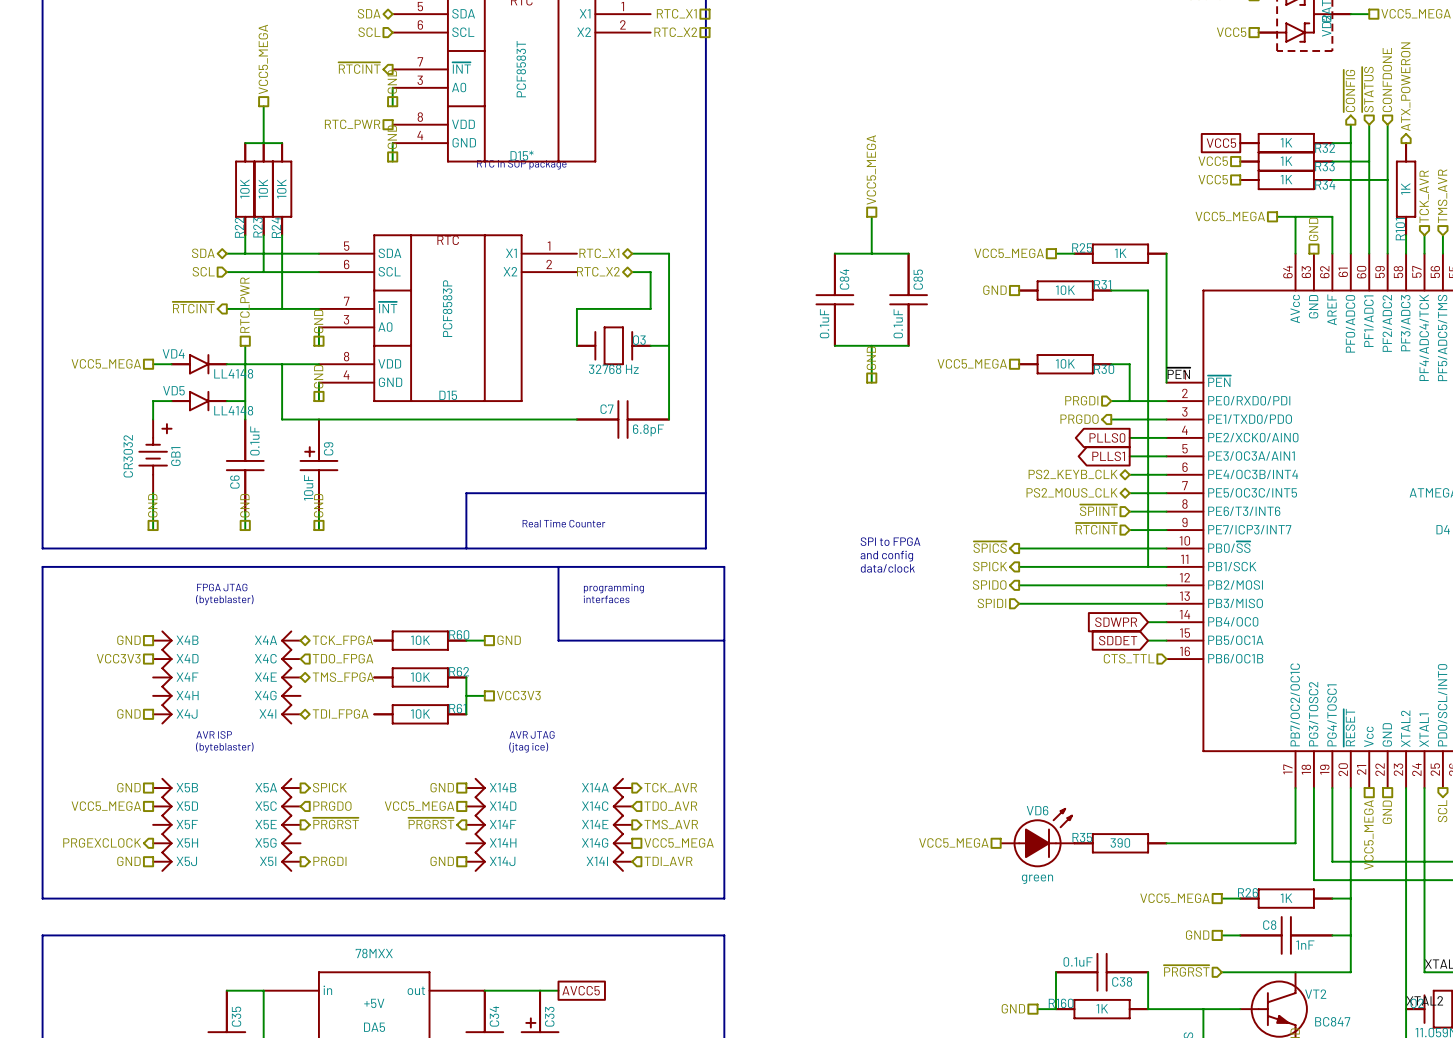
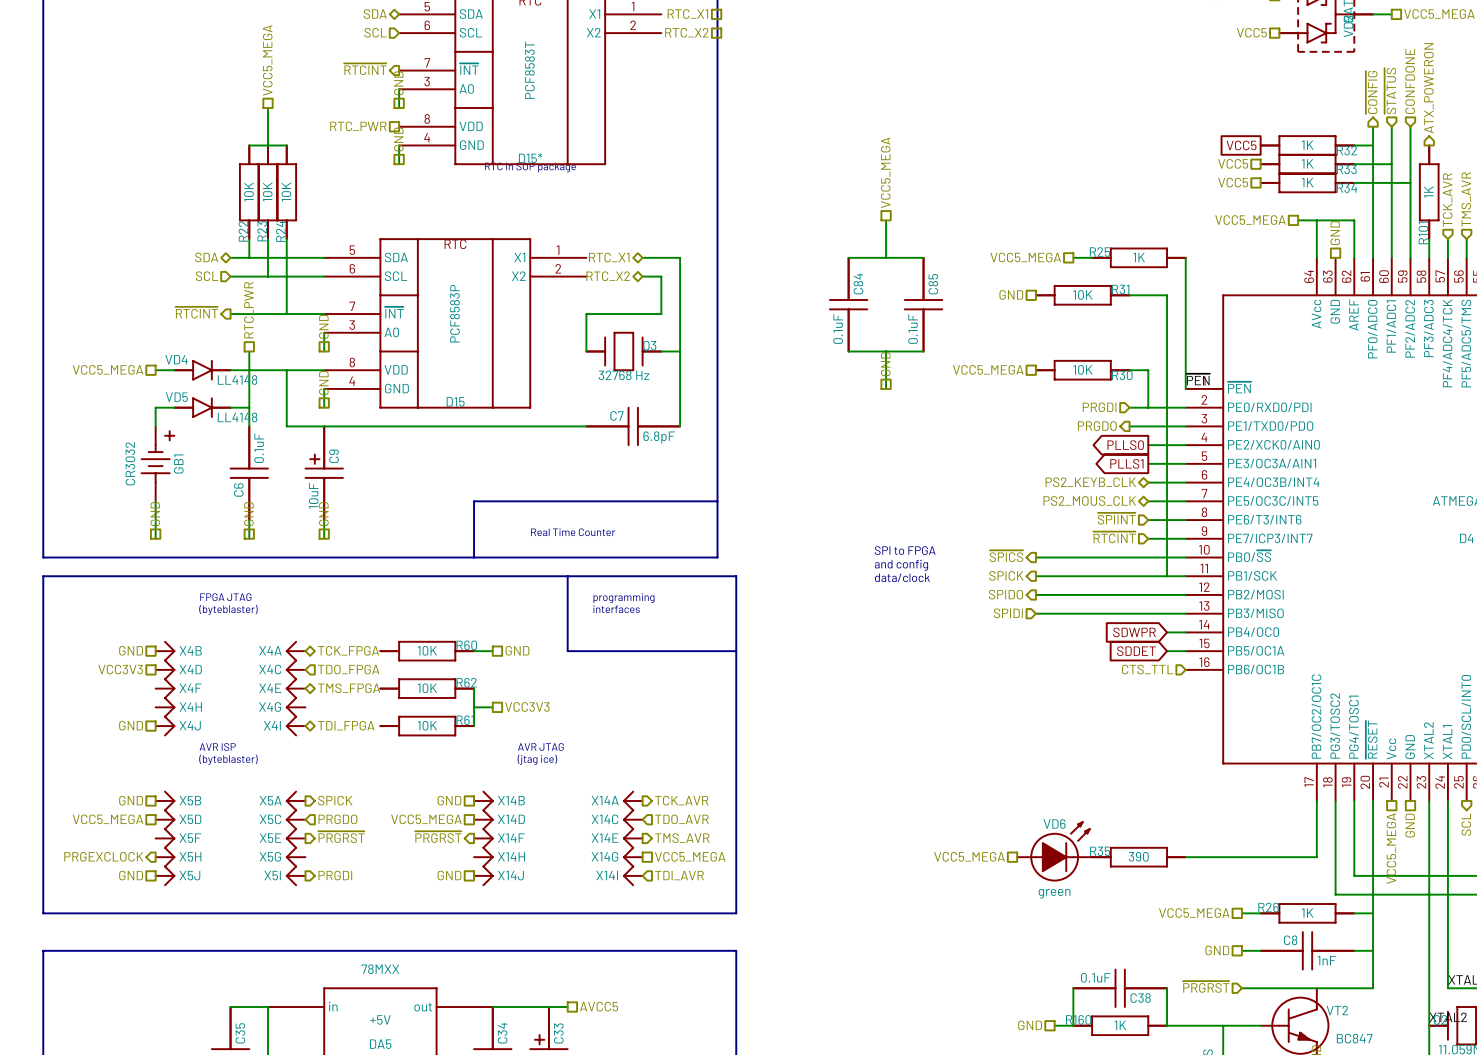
global label: AVCC5 (581, 990) -> none
hierarchical label: none -> AVCC5 (599, 1006)

